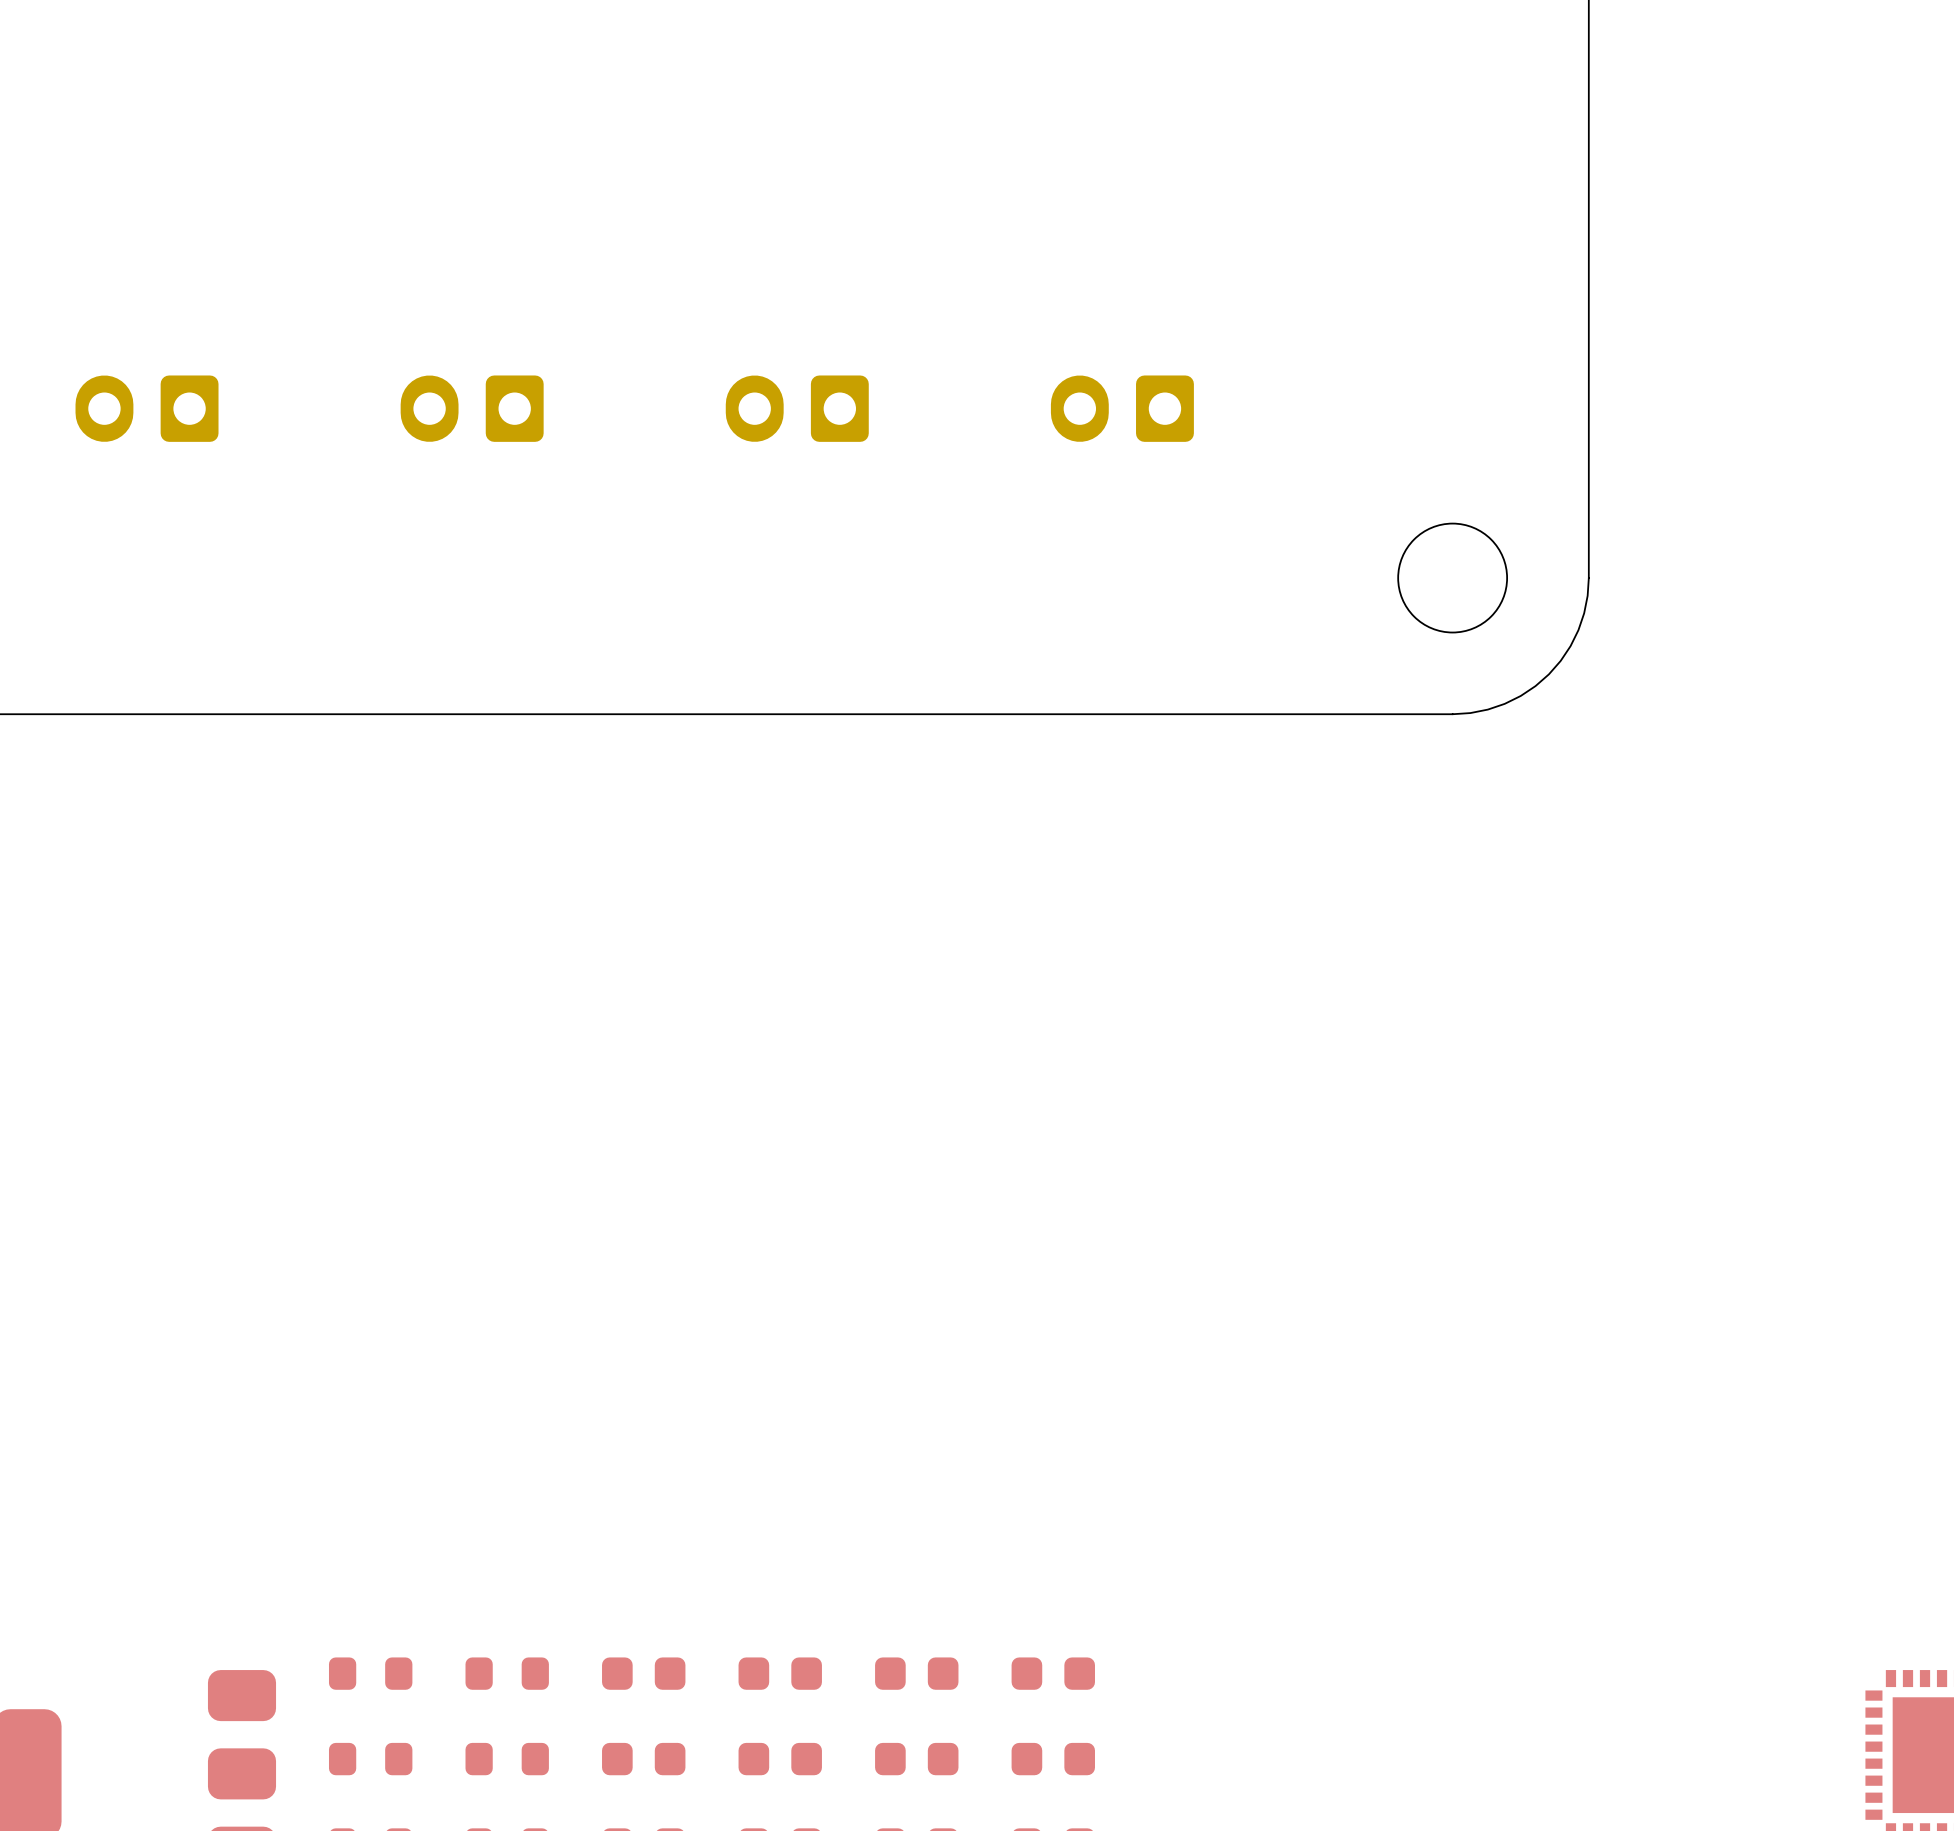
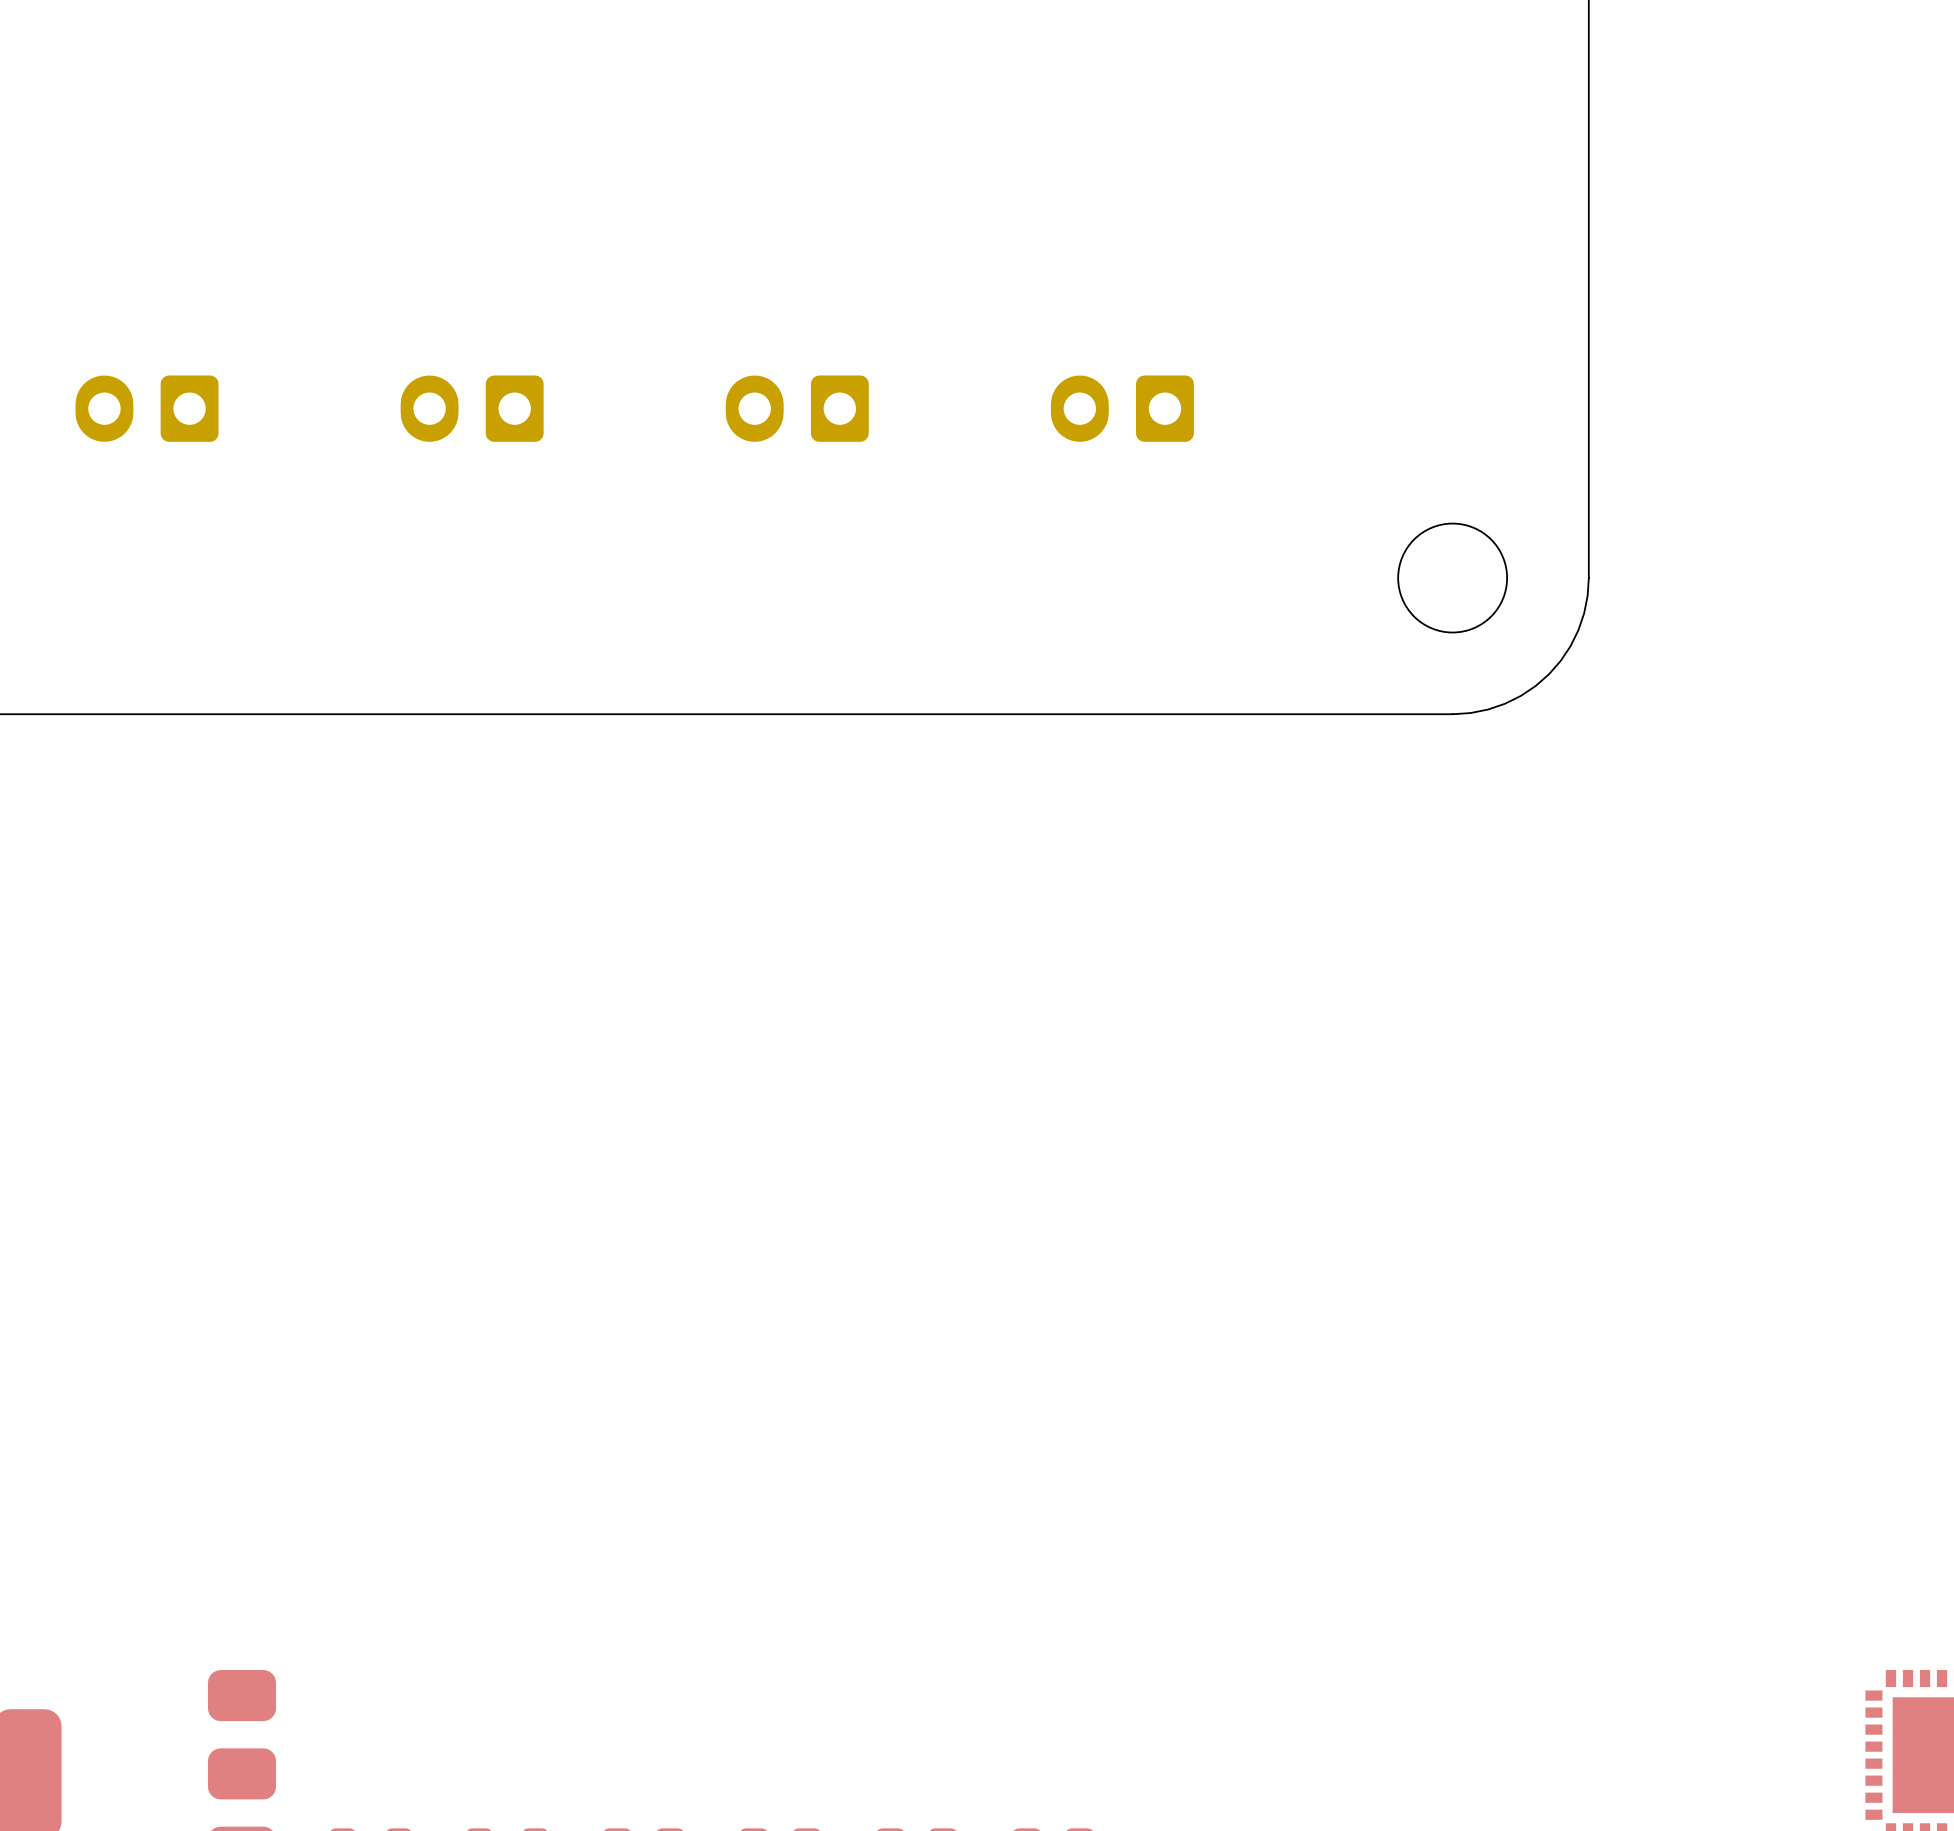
part: (370, 1673) -> none
part: (507, 1673) -> none
part: (643, 1673) -> none
part: (780, 1673) -> none
part: (916, 1673) -> none
part: (1053, 1673) -> none
part: (370, 1759) -> none
part: (507, 1759) -> none
part: (643, 1759) -> none
part: (780, 1759) -> none
part: (916, 1759) -> none
part: (1053, 1759) -> none

